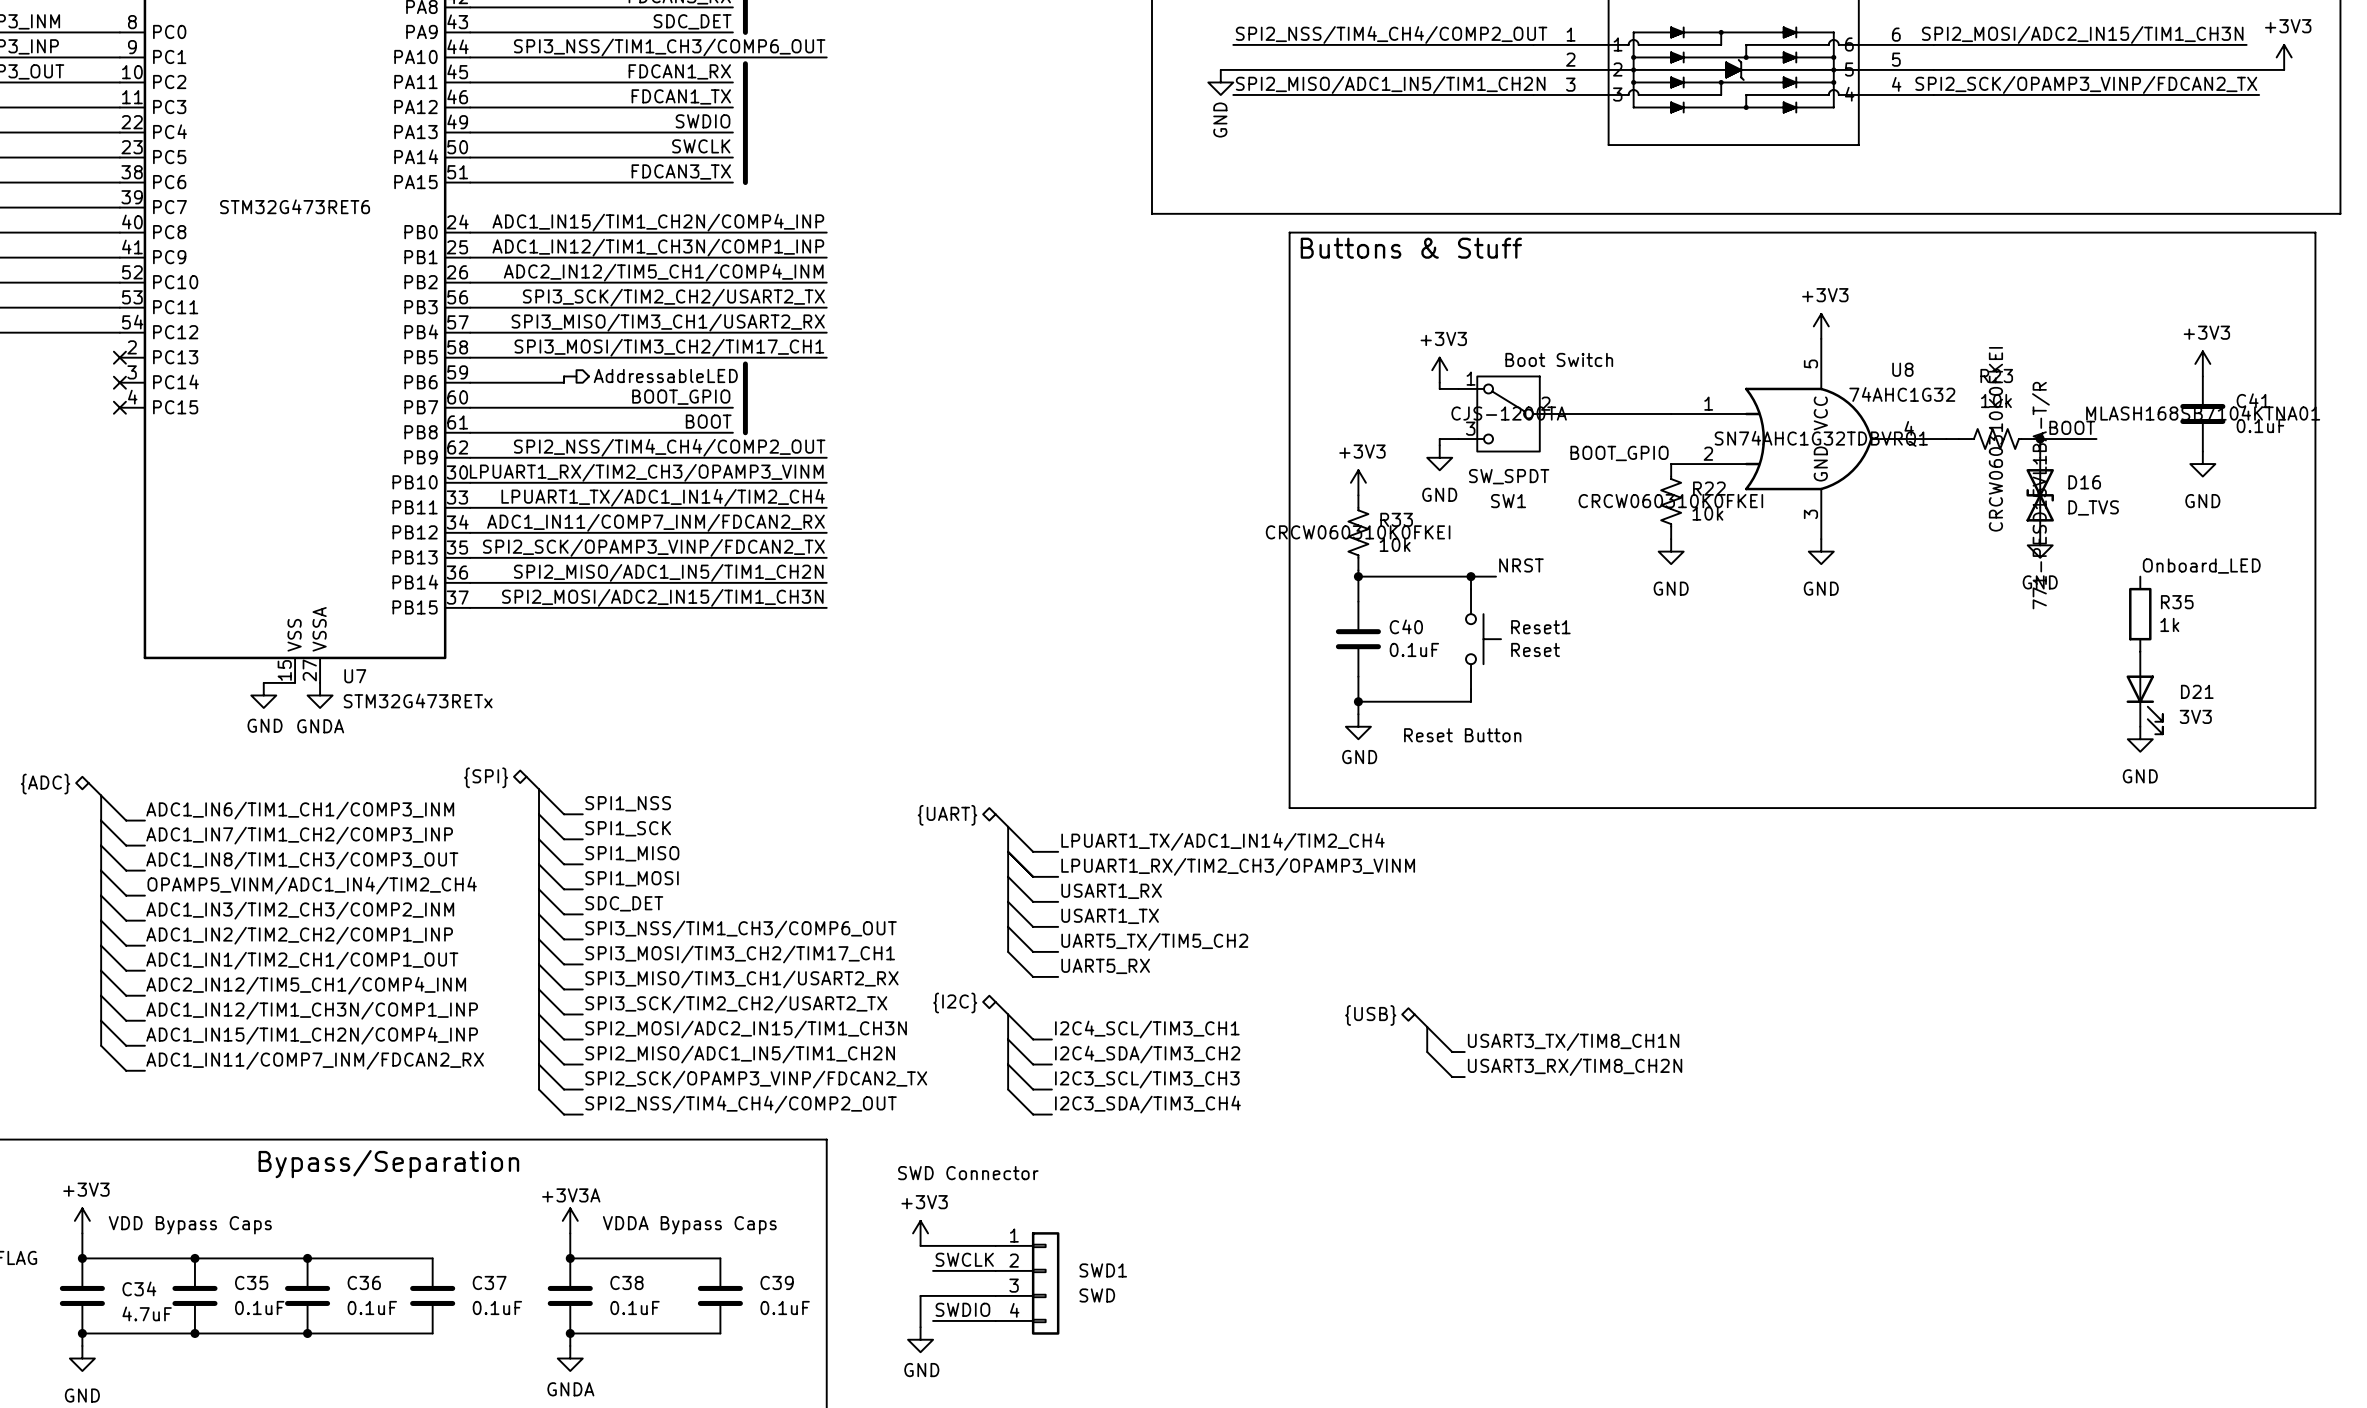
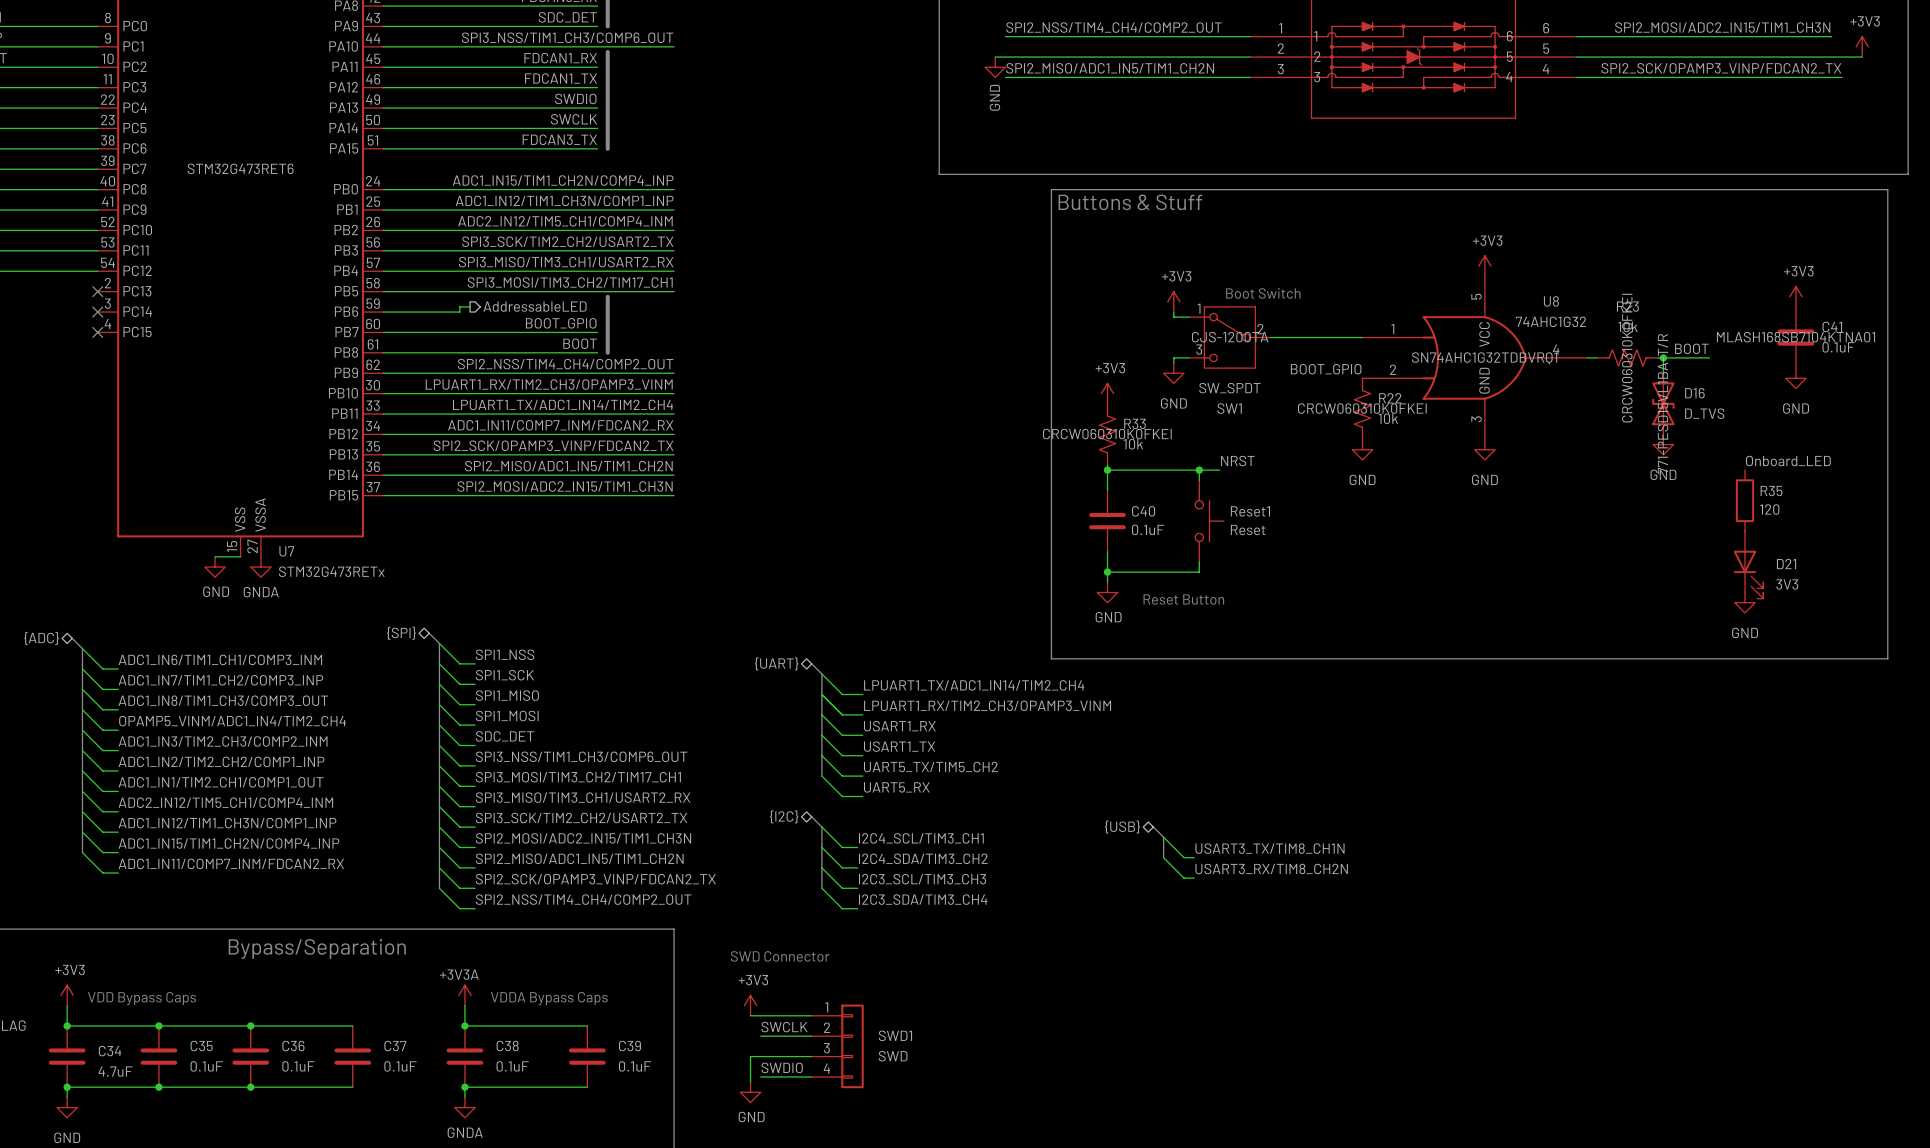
R35 value: 1k (2169, 624) -> 120 (1769, 509)

